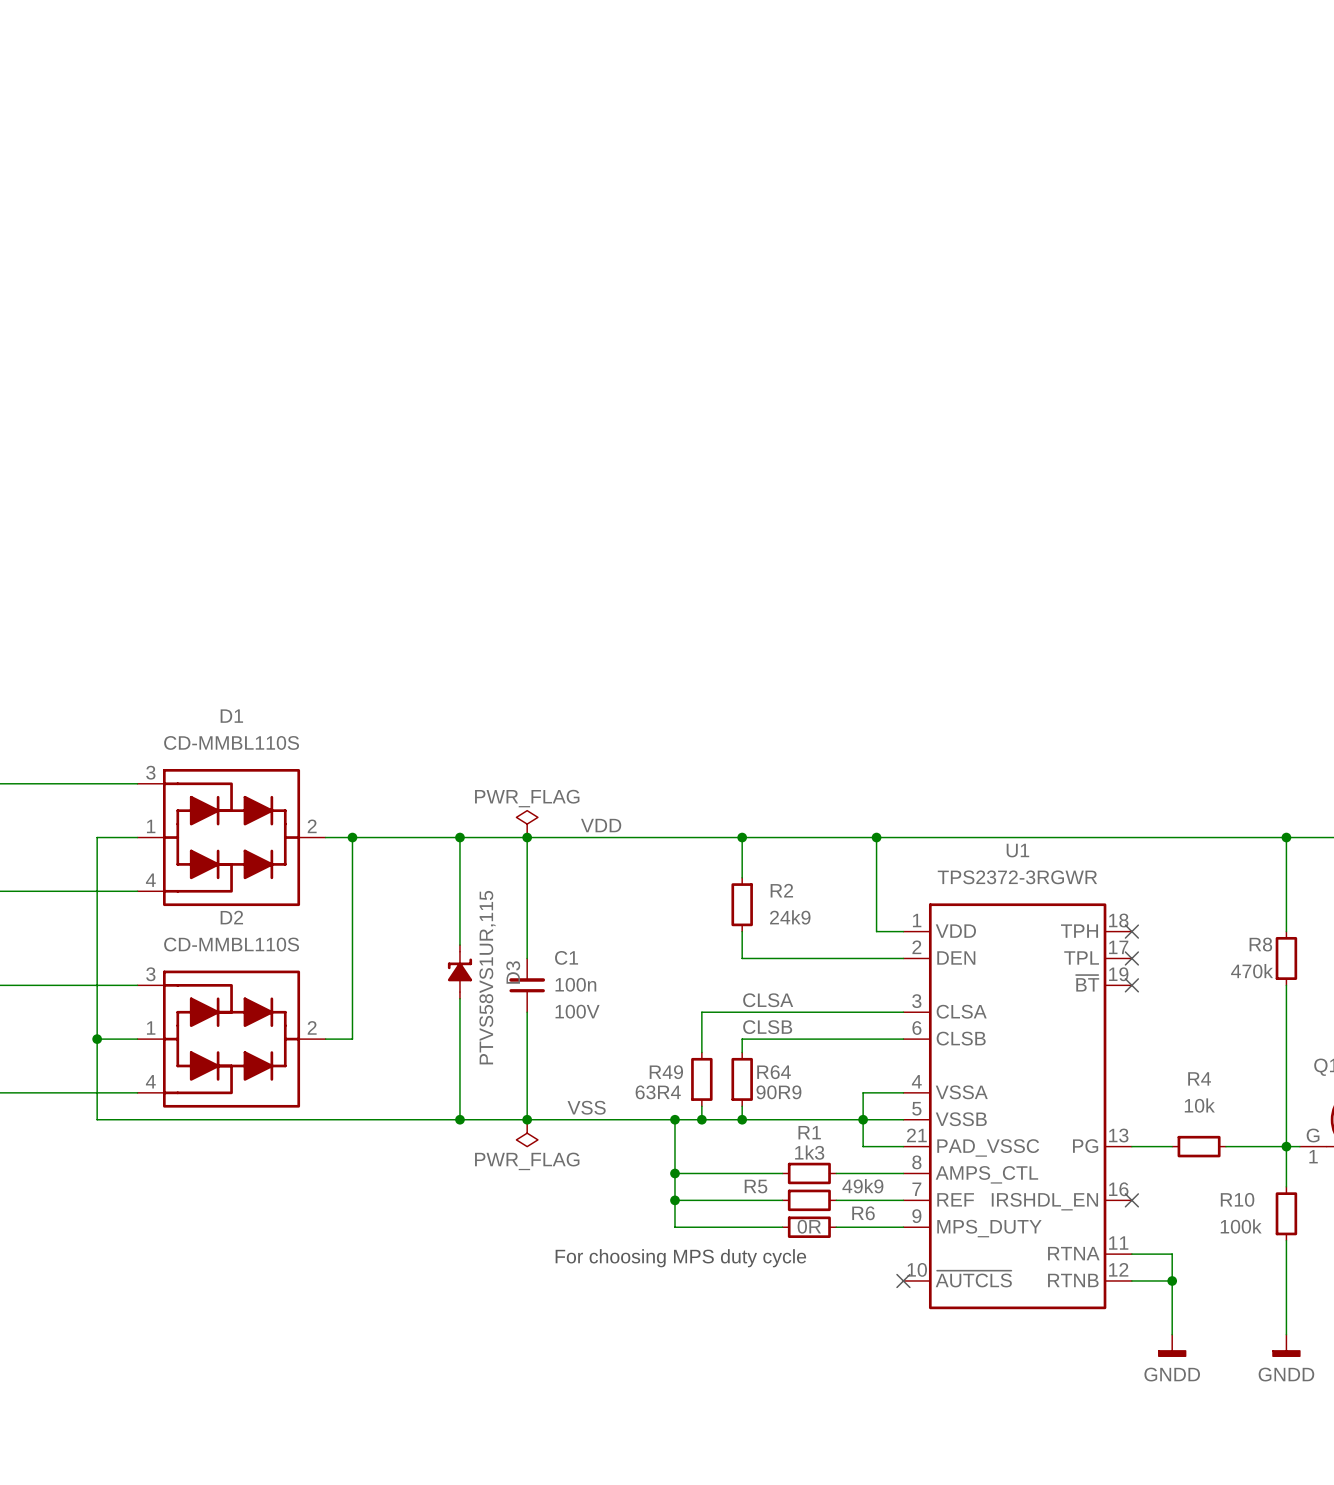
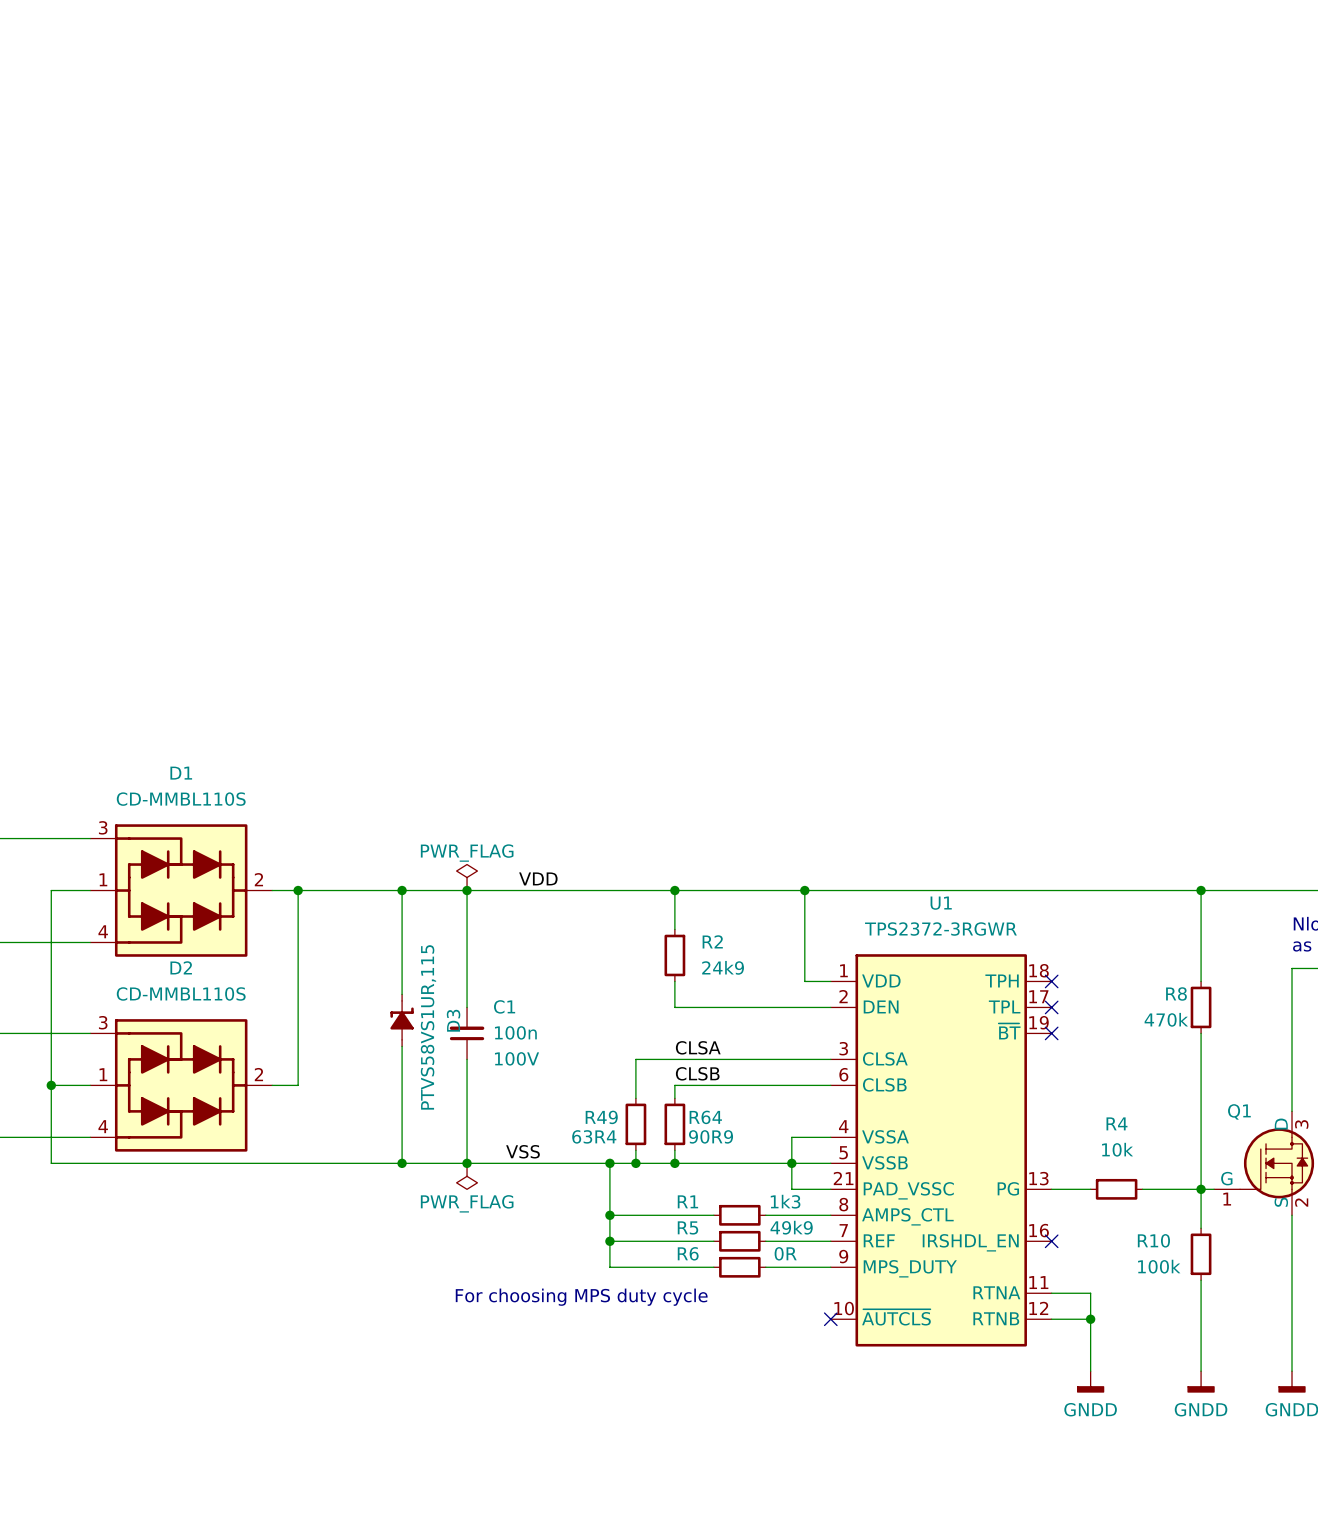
R1 name position: R1 (809, 1132) -> R1 (687, 1201)
R1 text position: 1k3 (809, 1152) -> 1k3 (785, 1201)
R6 name position: R6 (863, 1213) -> R6 (688, 1253)
R6 text position: 0R (809, 1226) -> 0R (785, 1253)
text position: For choosing MPS duty cycle (680, 1258) -> For choosing MPS duty cycle (581, 1297)

